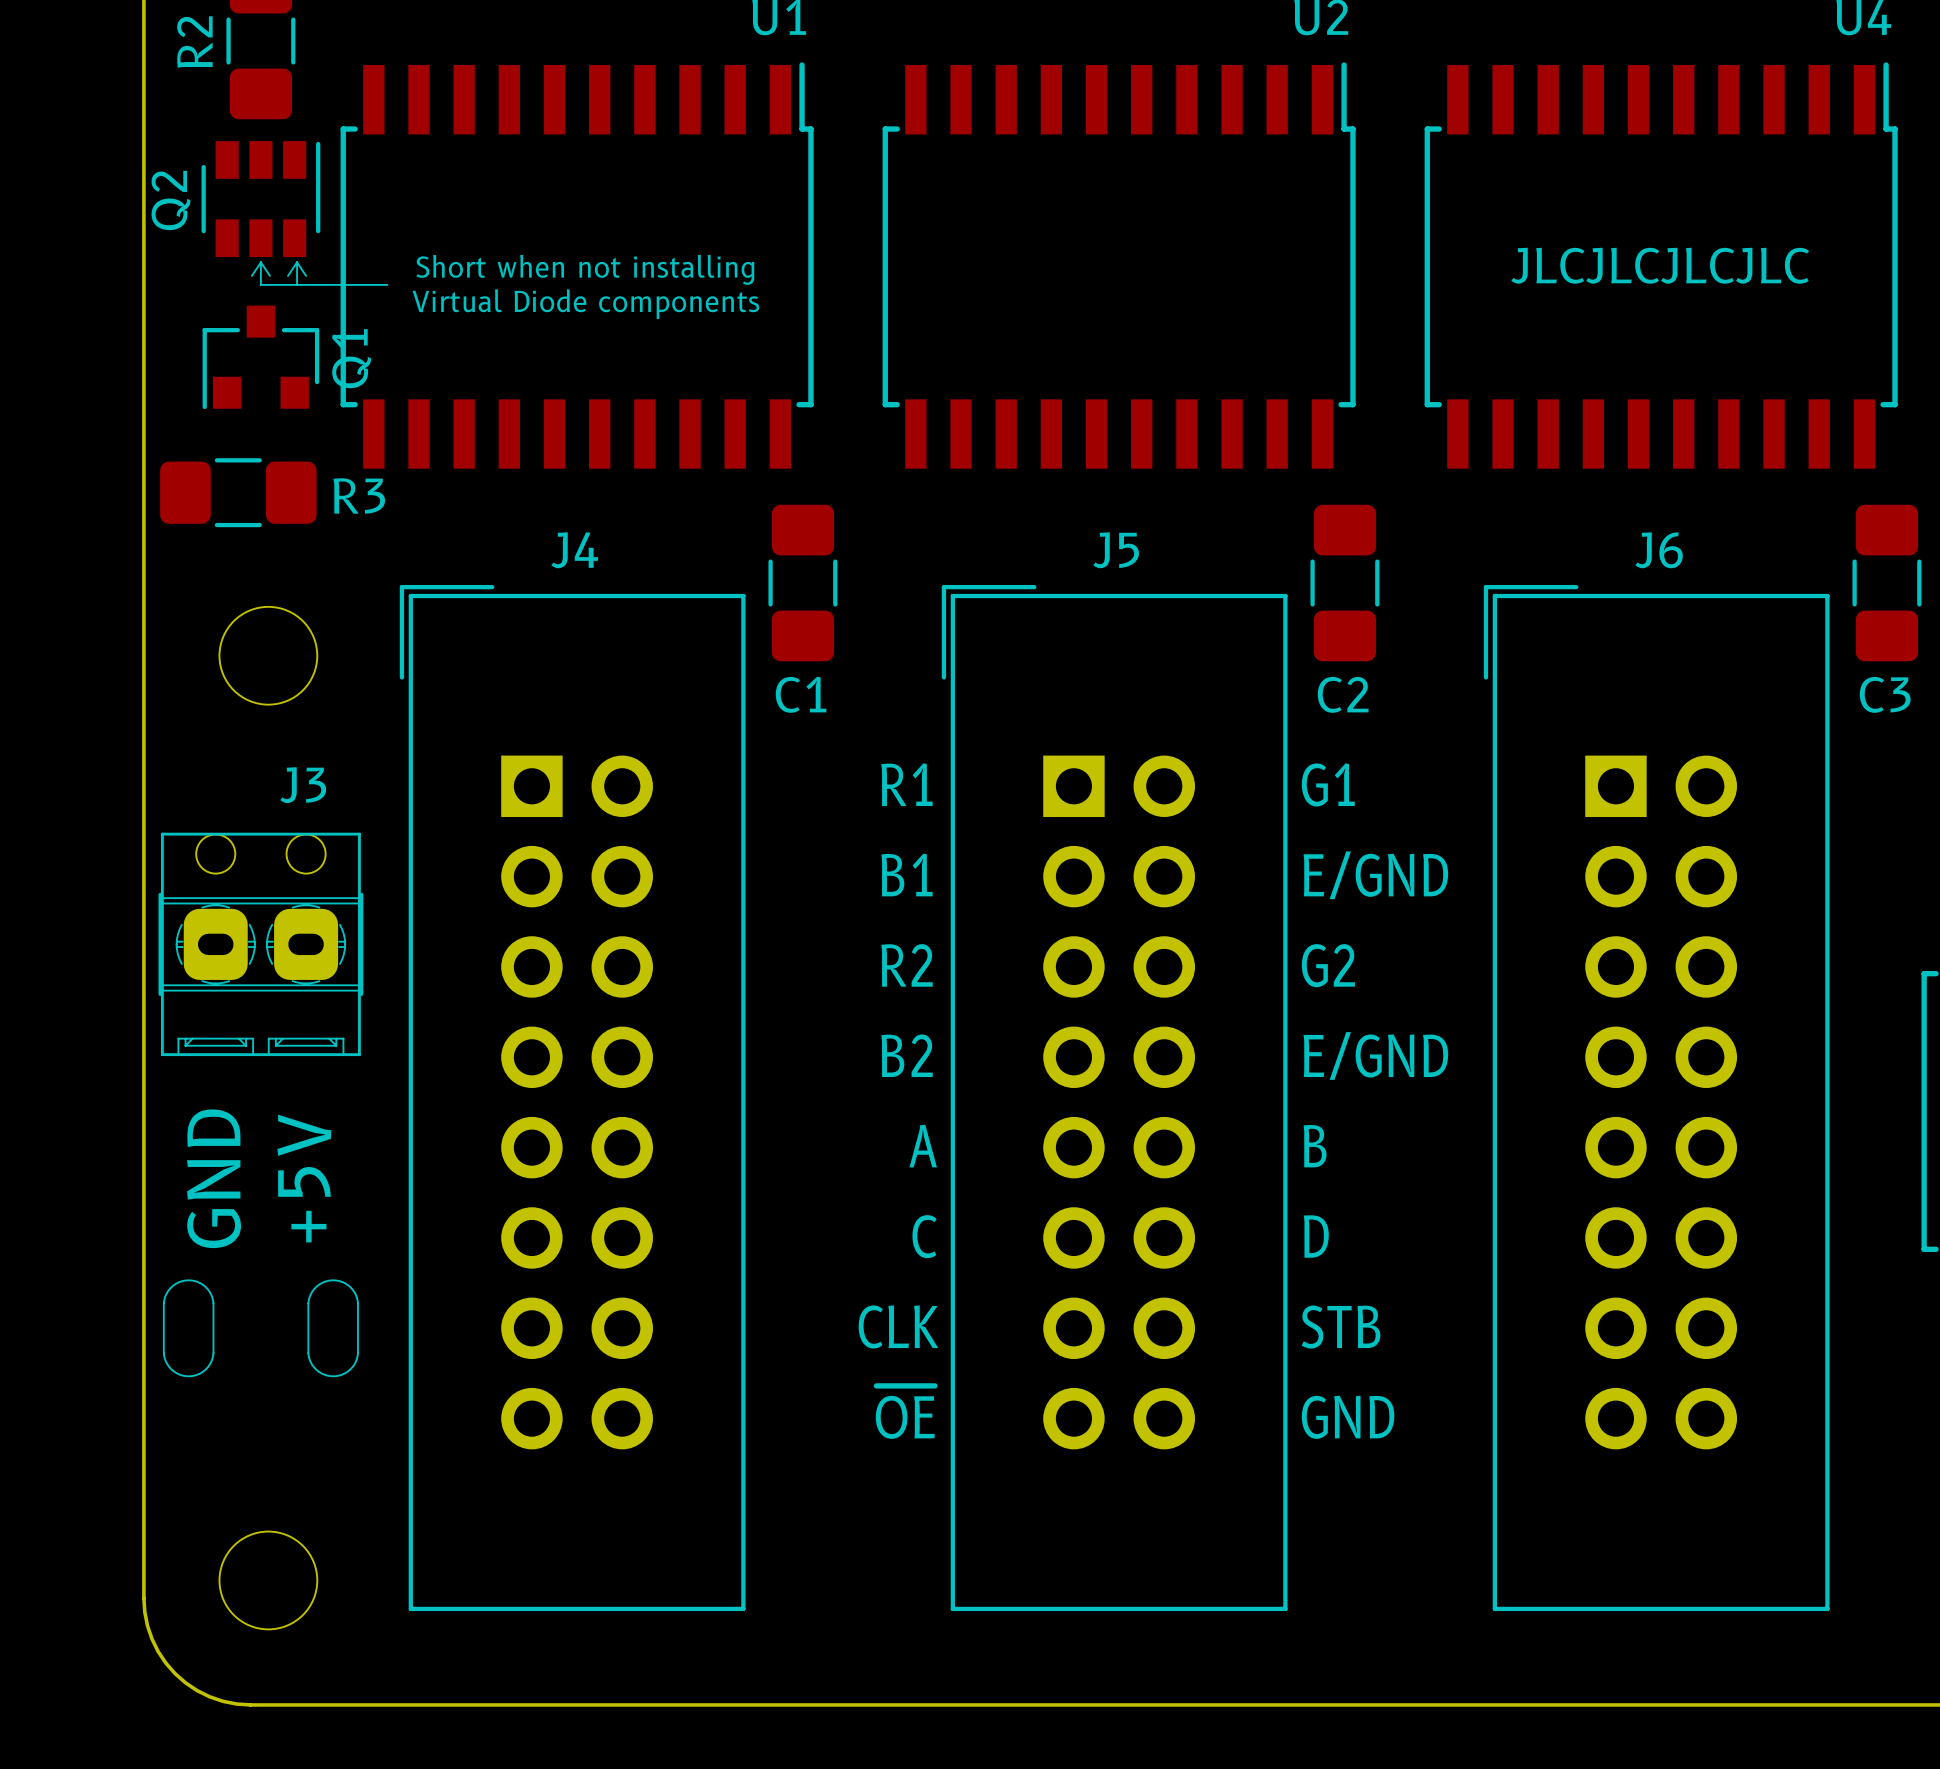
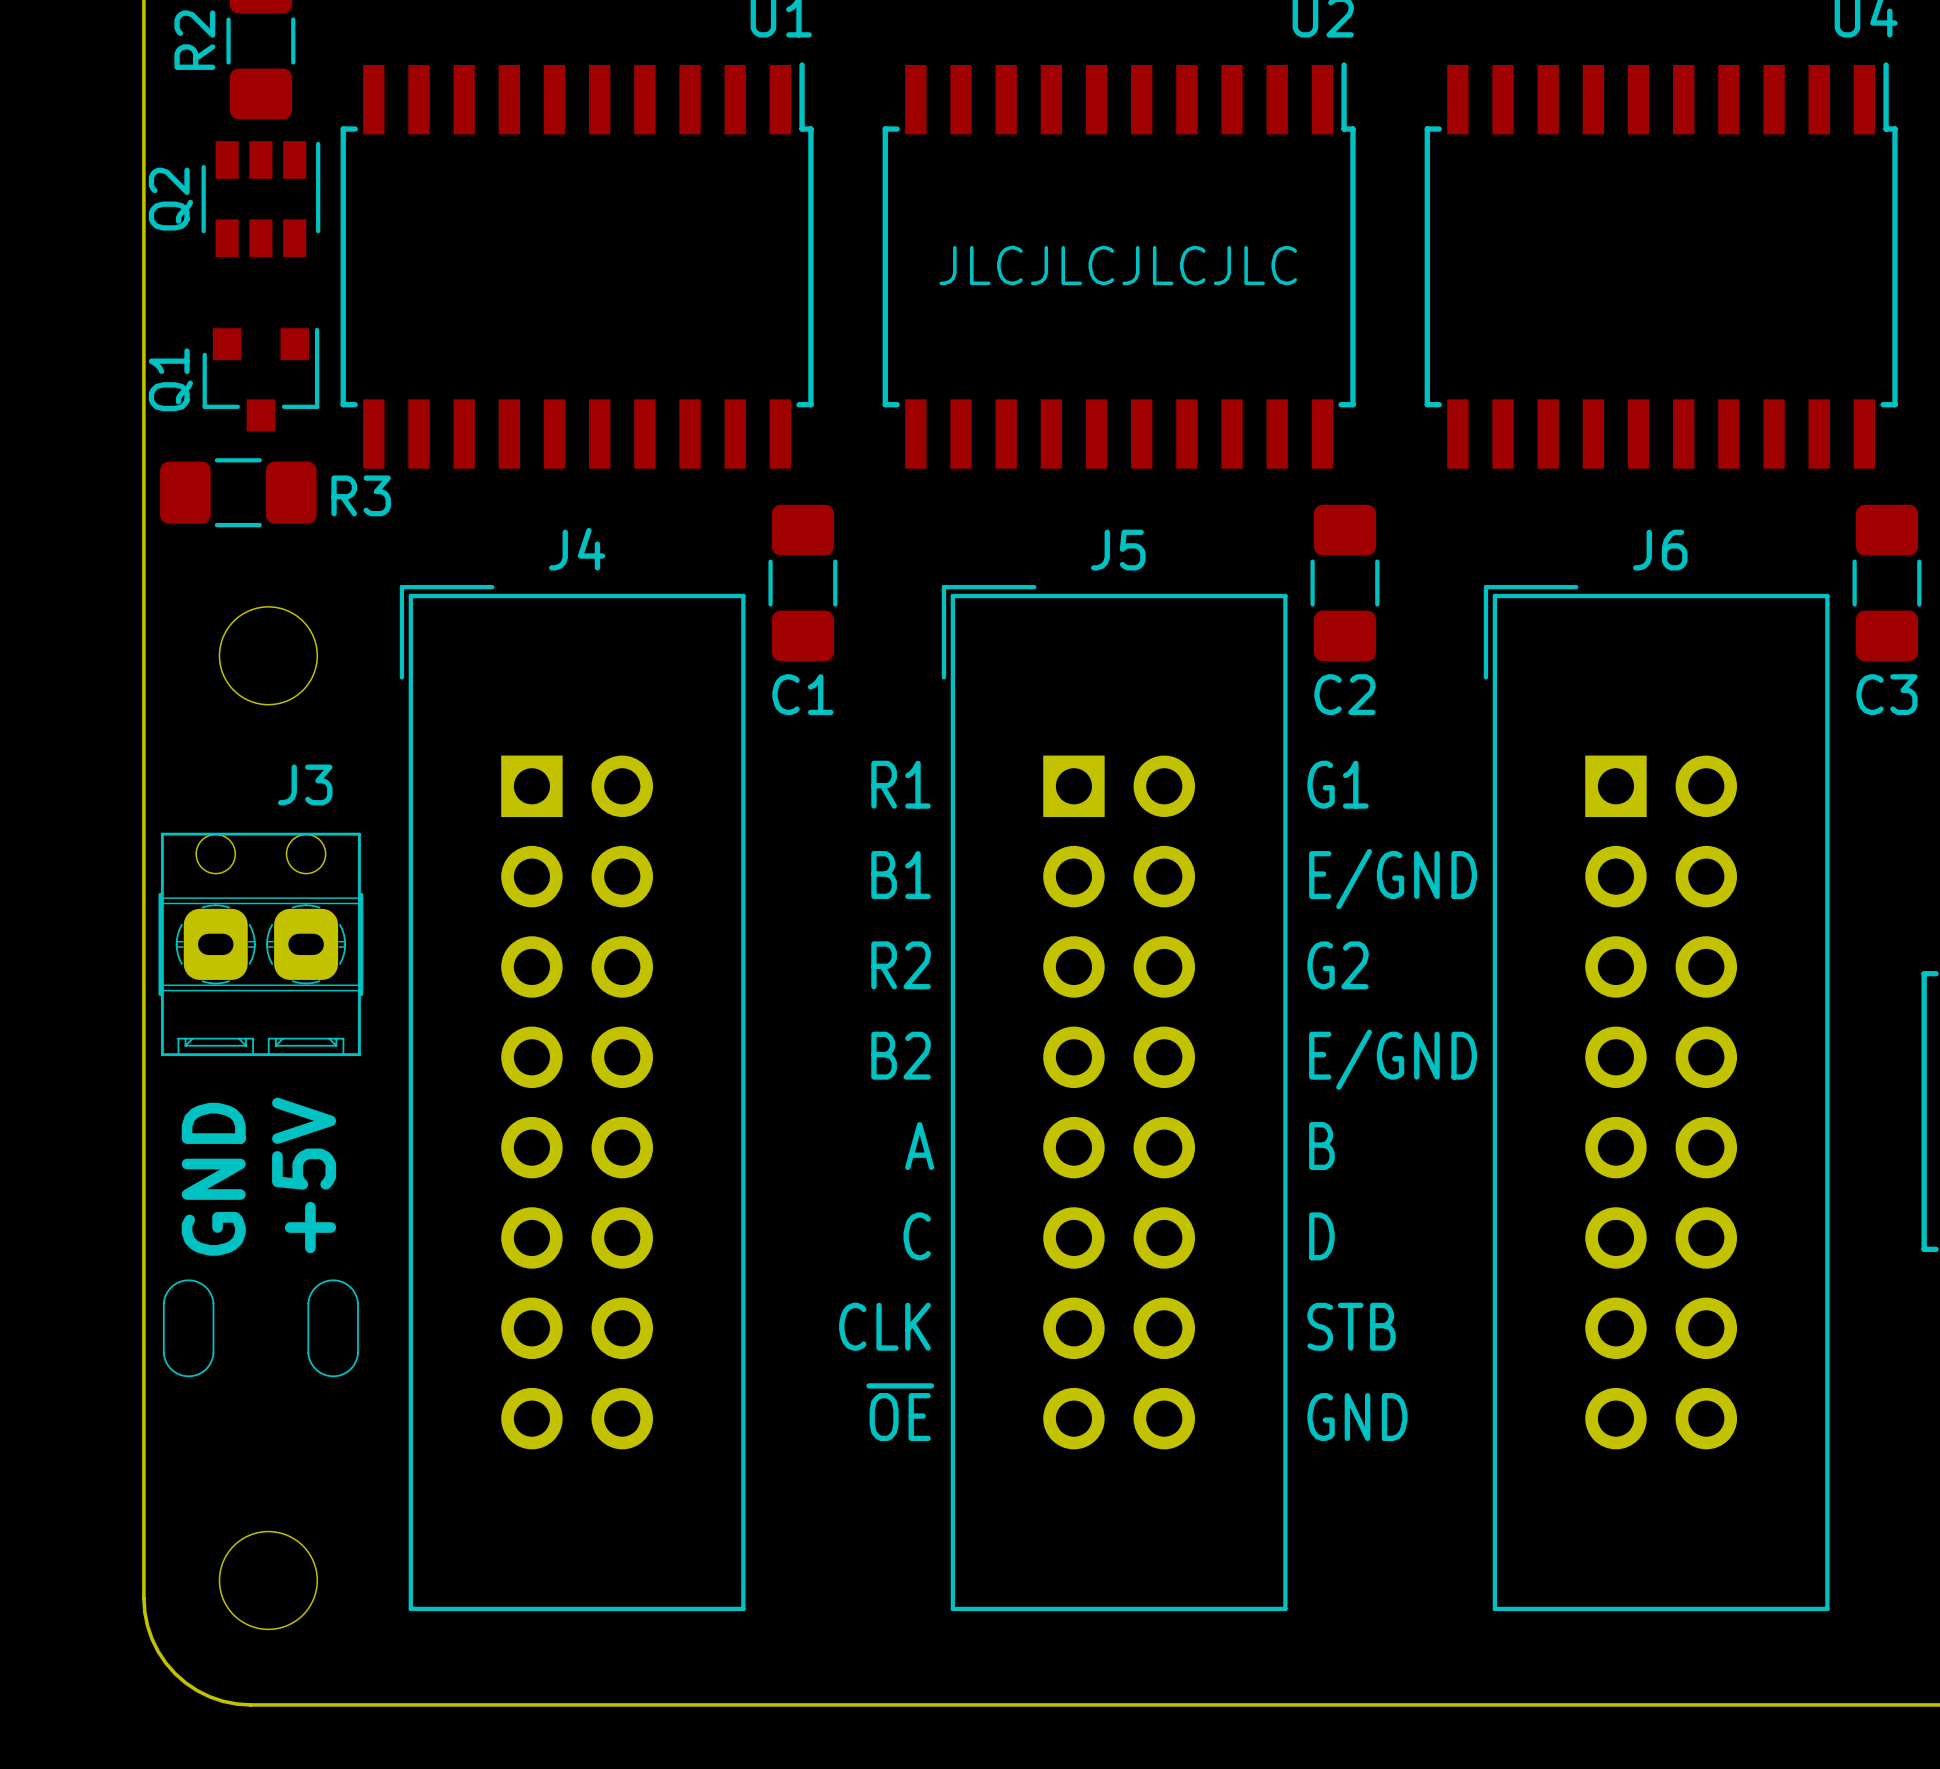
line: (260, 262) (269, 275) -> none
line: (260, 262) (260, 284) (387, 284) -> none
line: (260, 262) (251, 275) -> none
line: (297, 262) (306, 275) -> none
line: (297, 262) (297, 284) -> none
line: (297, 262) (288, 275) -> none
text position: JLCJLCJLCJLC (1660, 265) -> JLCJLCJLCJLC (1118, 265)
text: Short when not installing (585, 269) -> none
text: Virtual Diode components (585, 304) -> none
Q1 rotation: 0° (260, 357) -> 180° (260, 379)

